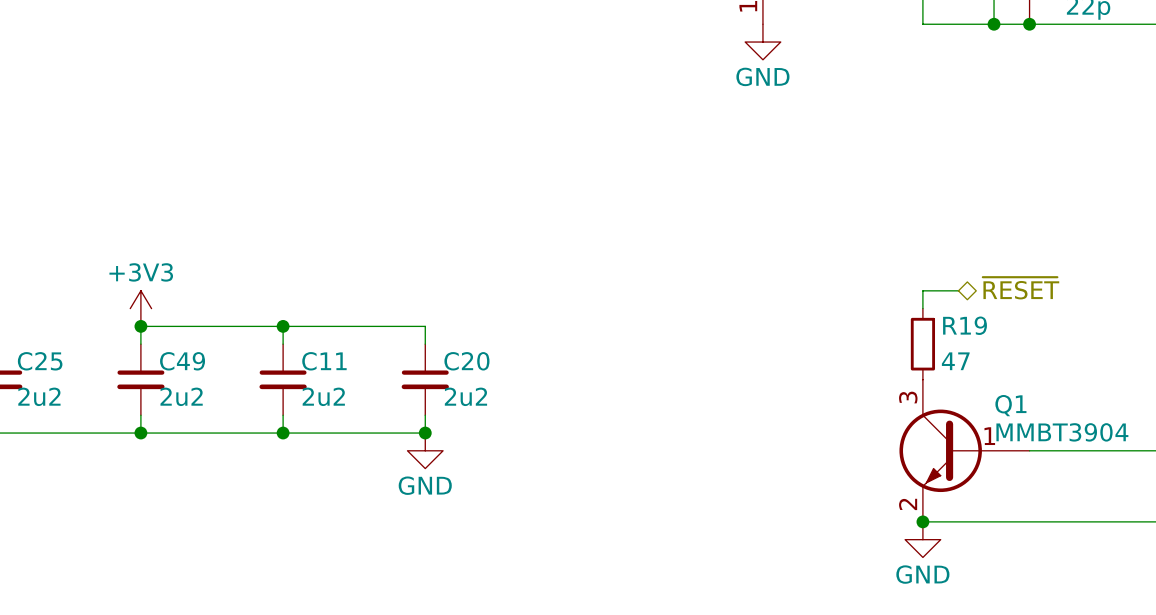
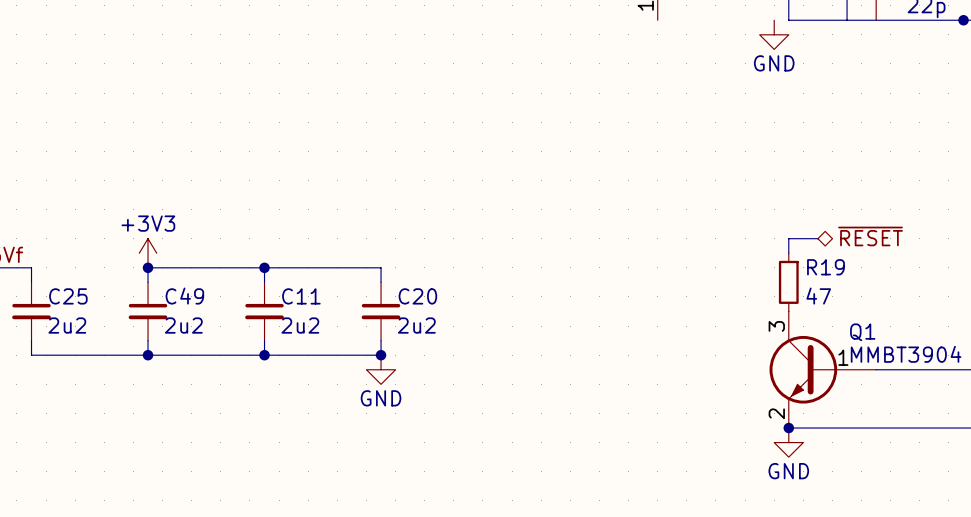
junction: (994, 24) -> none
junction: (1029, 24) -> none
junction: none -> (963, 20)
power symbol: GND (762, 42) -> none
power symbol: none -> GND (774, 34)

